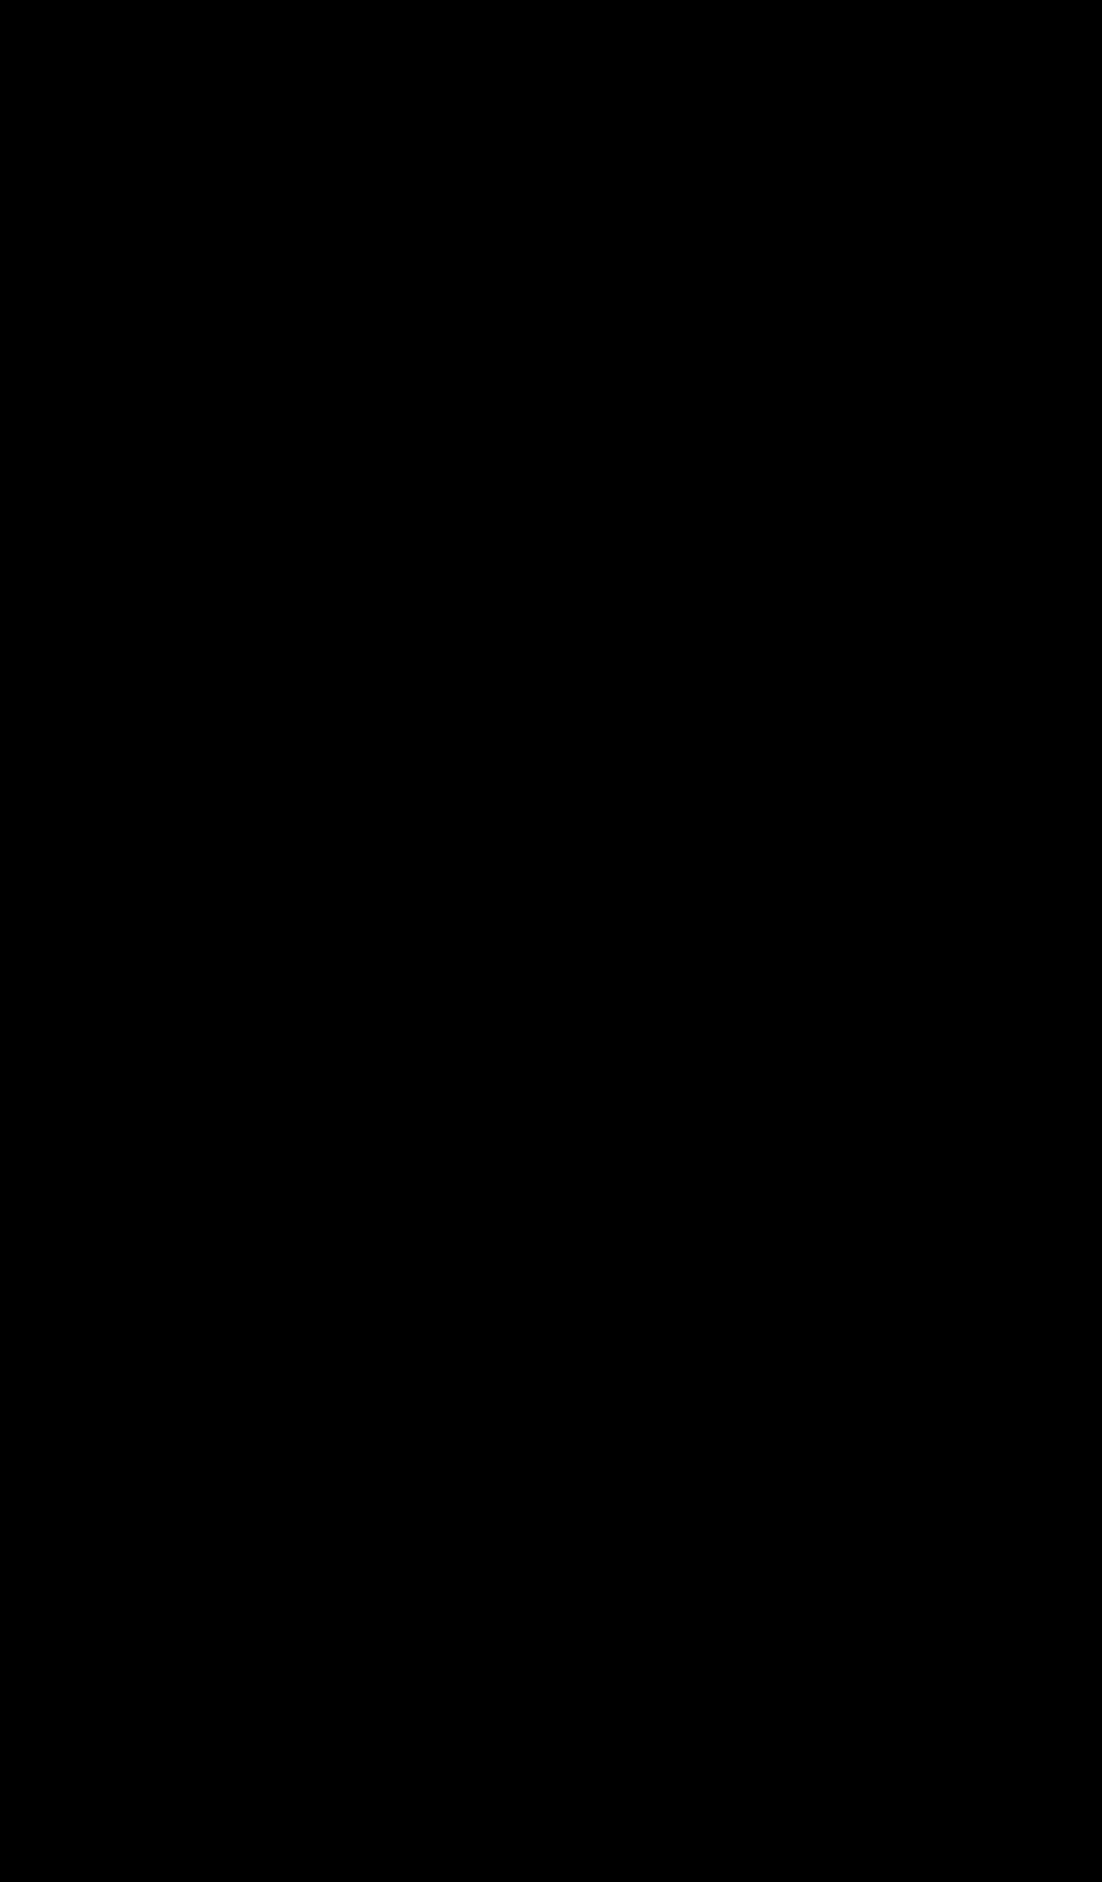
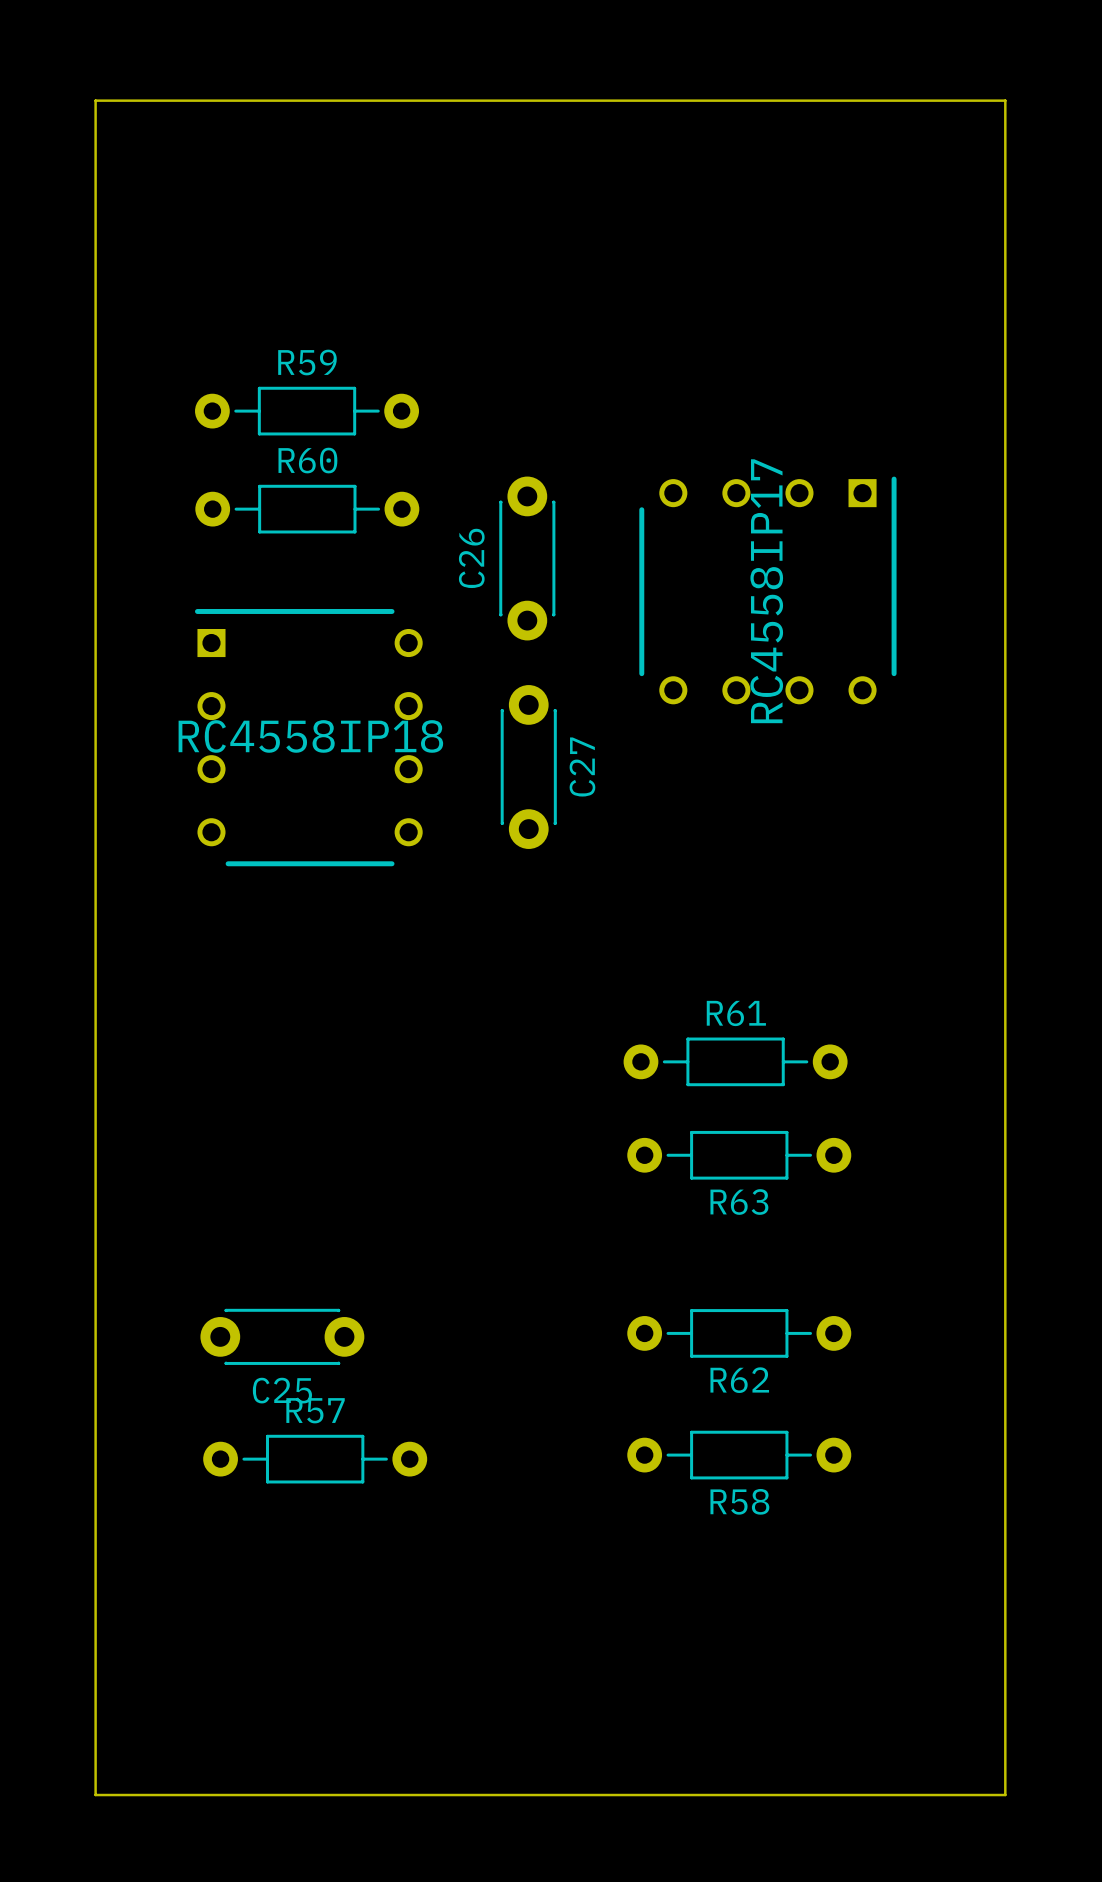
board edge: none -> (95, 100) (95, 1795) (1005, 1795) (1005, 100) (95, 100)
R59: none -> (307, 411)
R60: none -> (307, 509)
C26: none -> (527, 558)
RC4558IP17: none -> (767, 590)
RC4558IP18: none -> (308, 737)
C27: none -> (528, 767)
R61: none -> (735, 1061)
R63: none -> (739, 1155)
R62: none -> (739, 1333)
C25: none -> (282, 1336)
R58: none -> (739, 1455)
R57: none -> (315, 1459)

